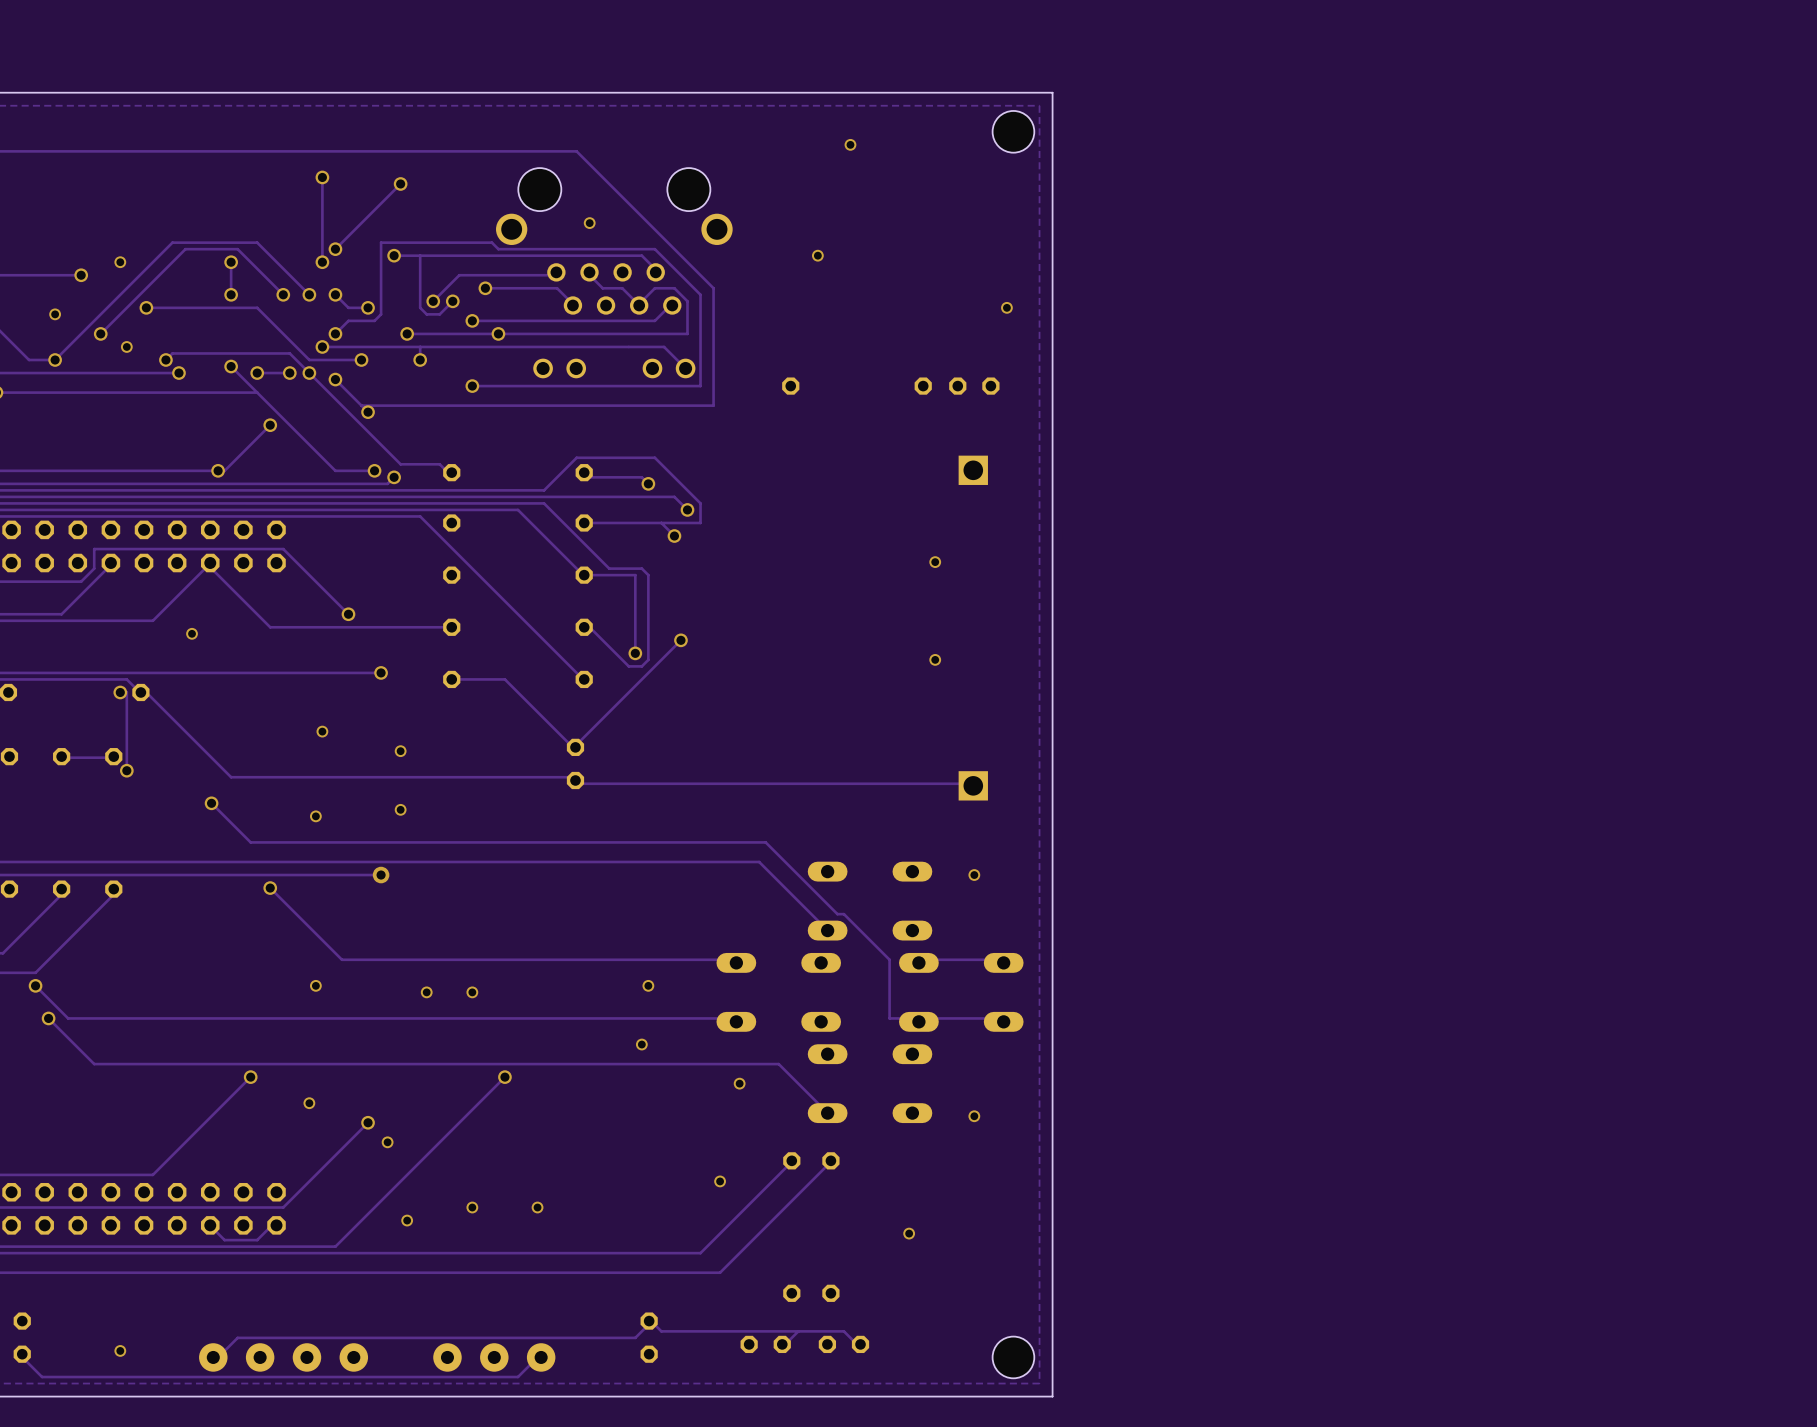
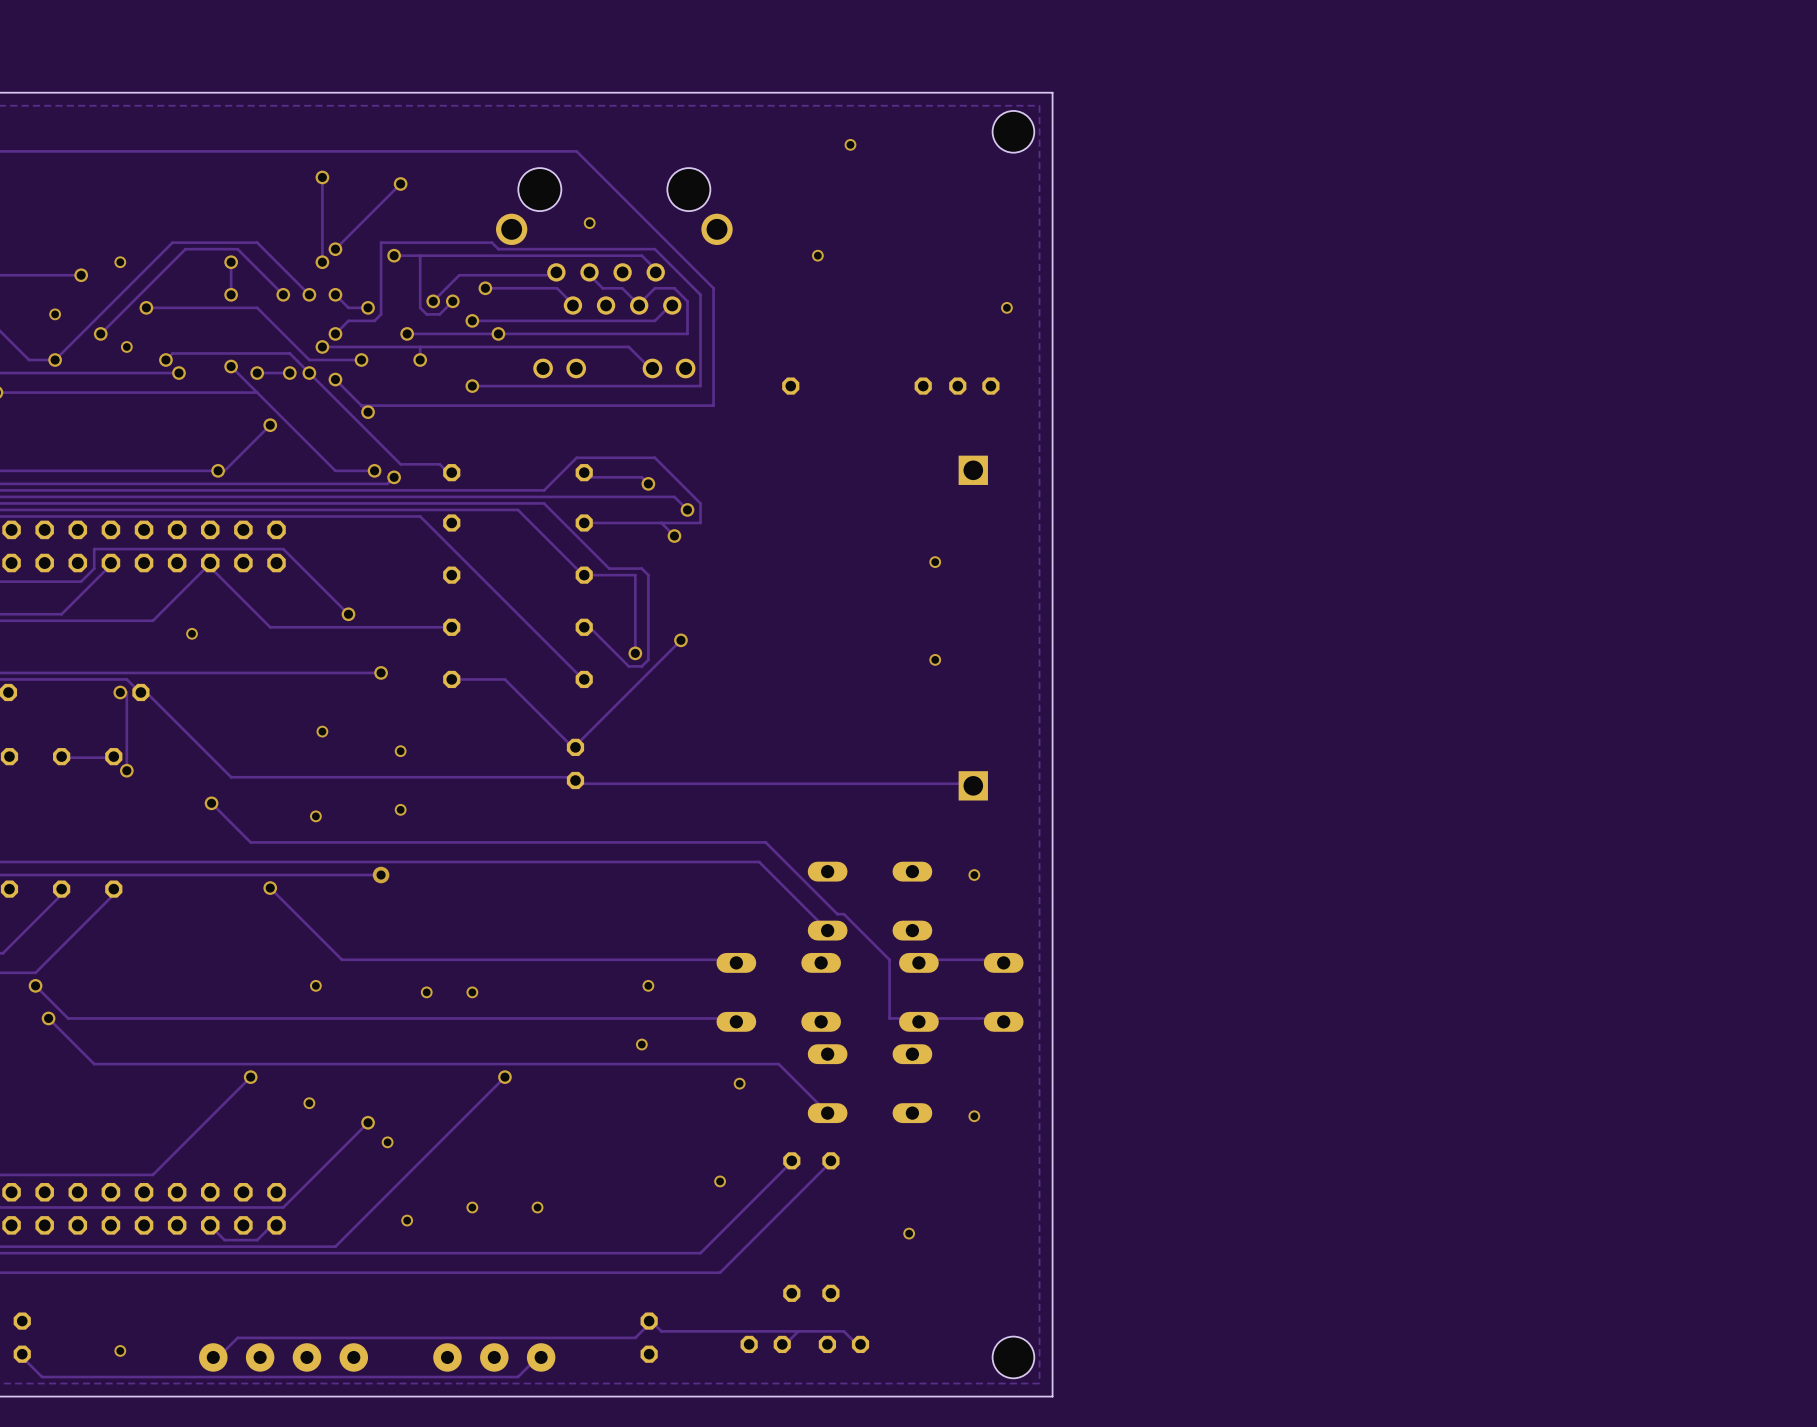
track: (628, 346) (664, 346) (685, 368) -> (628, 346) (652, 368)

